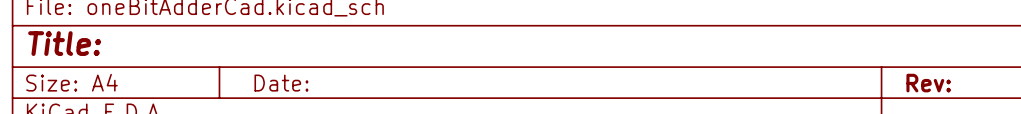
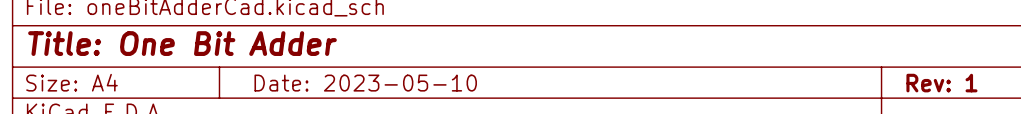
title block: Title: (64, 43) -> Title: One Bit Adder (182, 43)
title block: Date: (281, 83) -> Date: 2023-05-10 (365, 83)
title block: Rev: (928, 83) -> Rev: 1 (941, 83)

